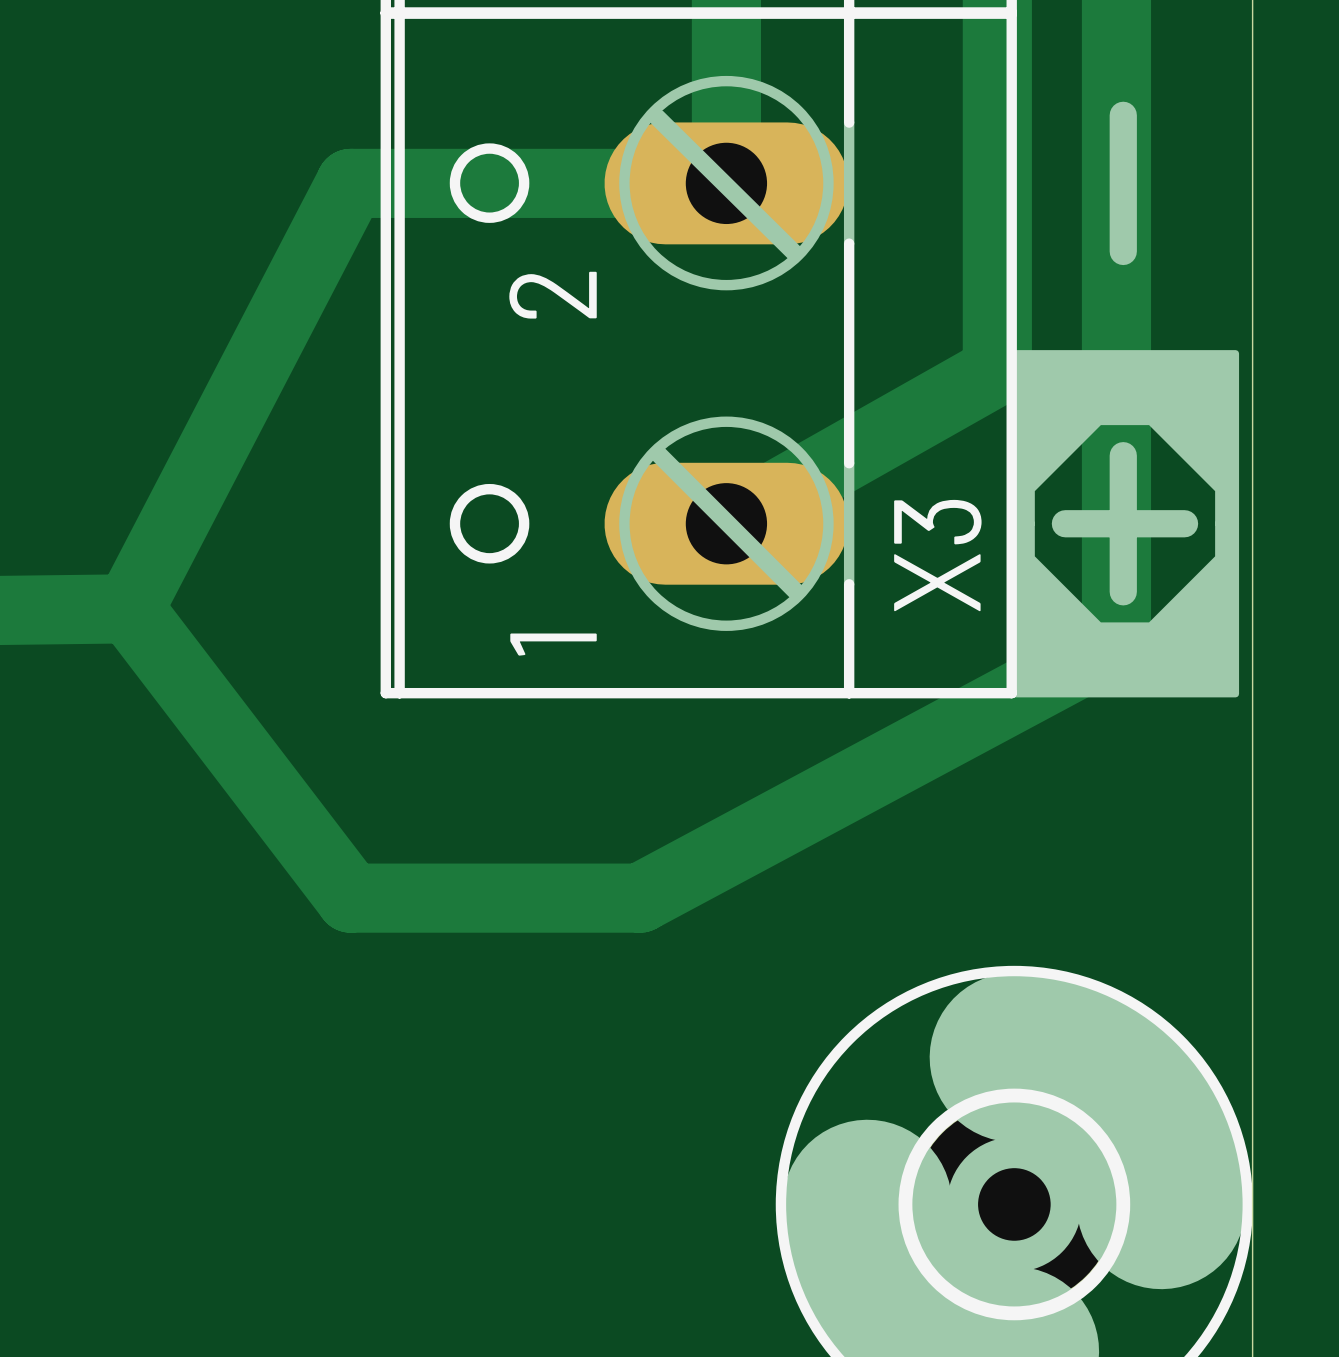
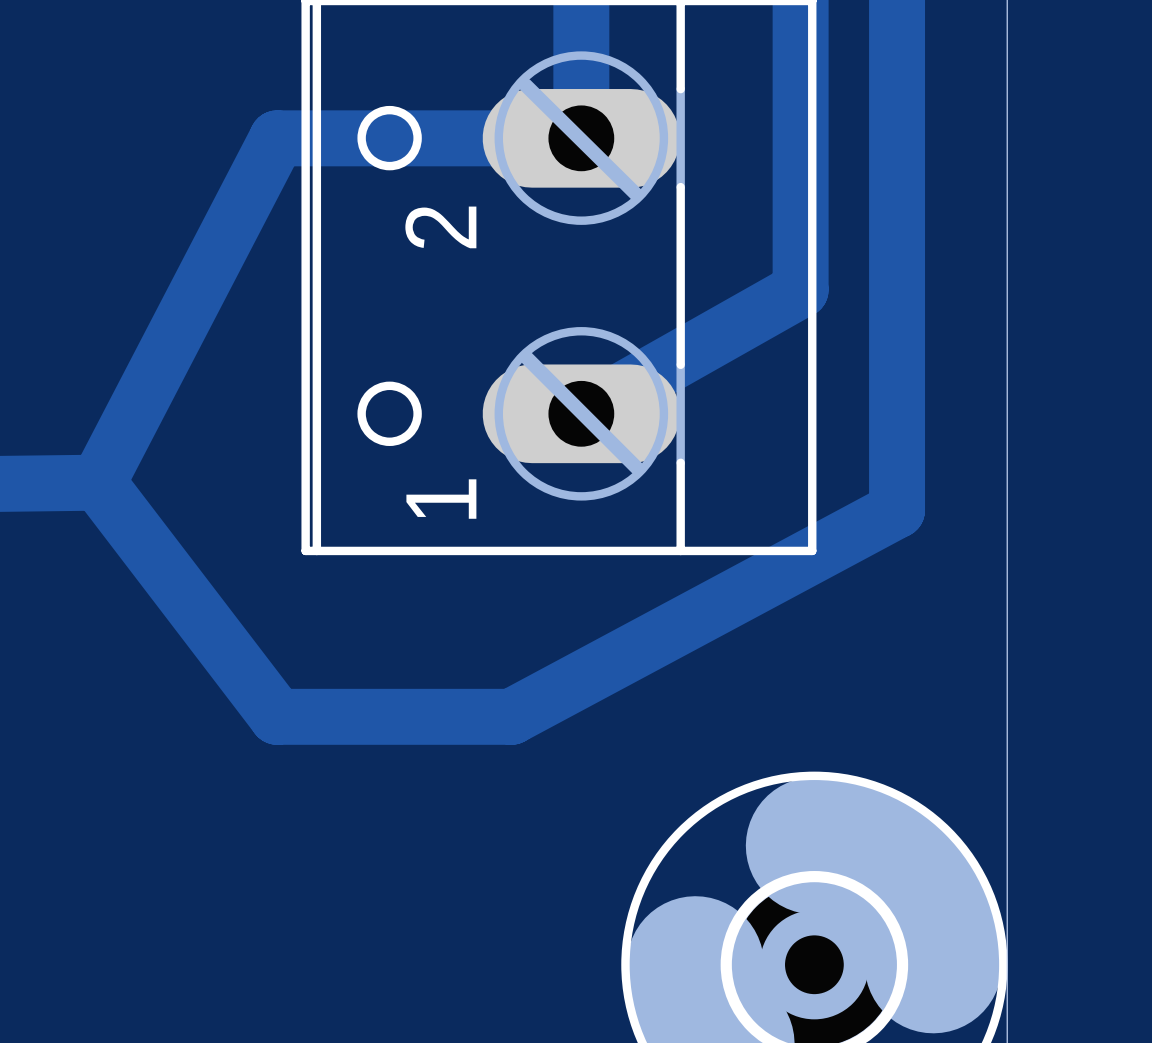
line: (1123, 115) (1123, 251) -> none
drawing: [1010, 350, 1240, 698] -> none
line: (1123, 455) (1123, 591) -> none
line: (1065, 523) (1184, 523) -> none
X3 name: X3 (937, 555) -> none

